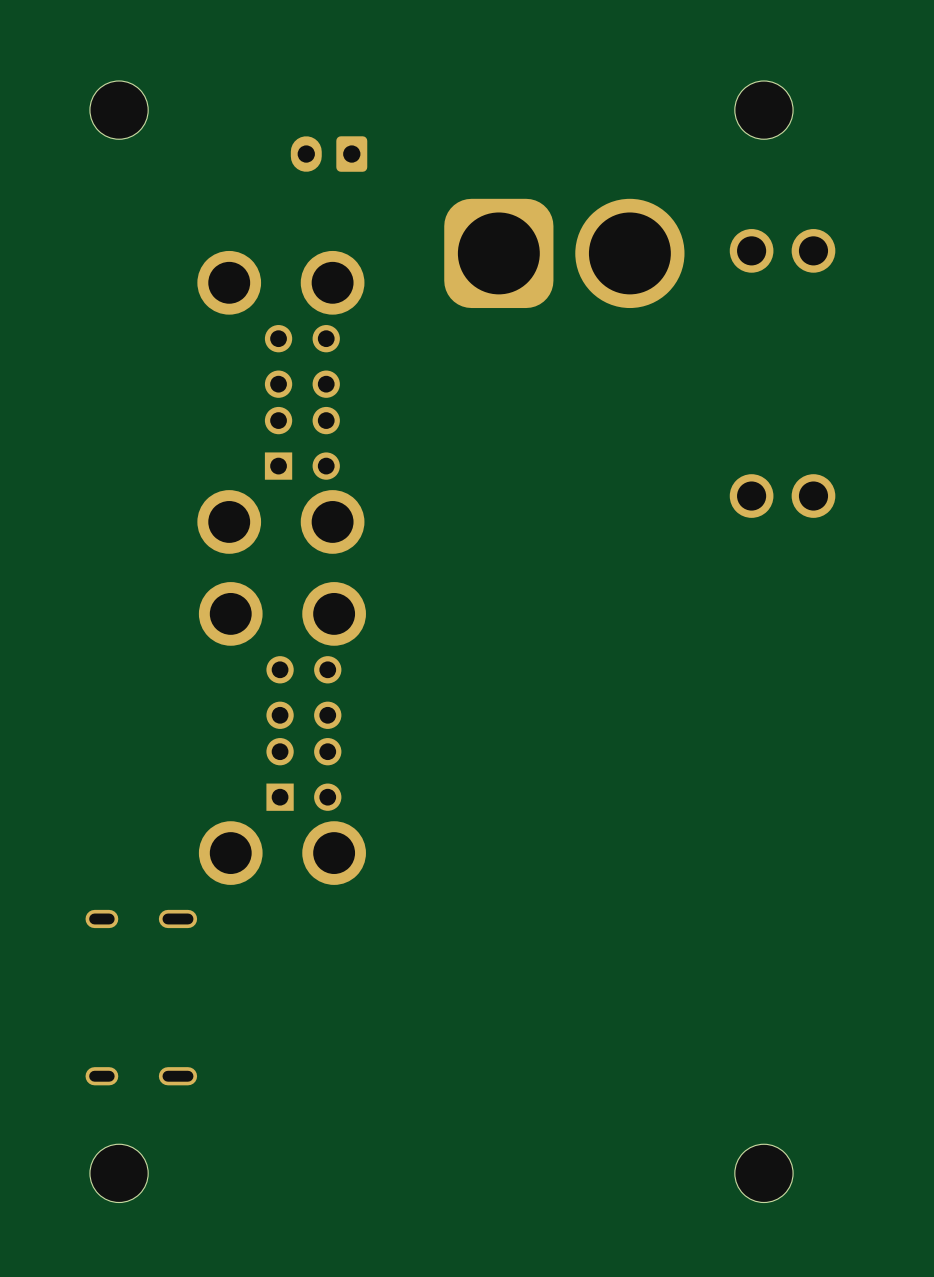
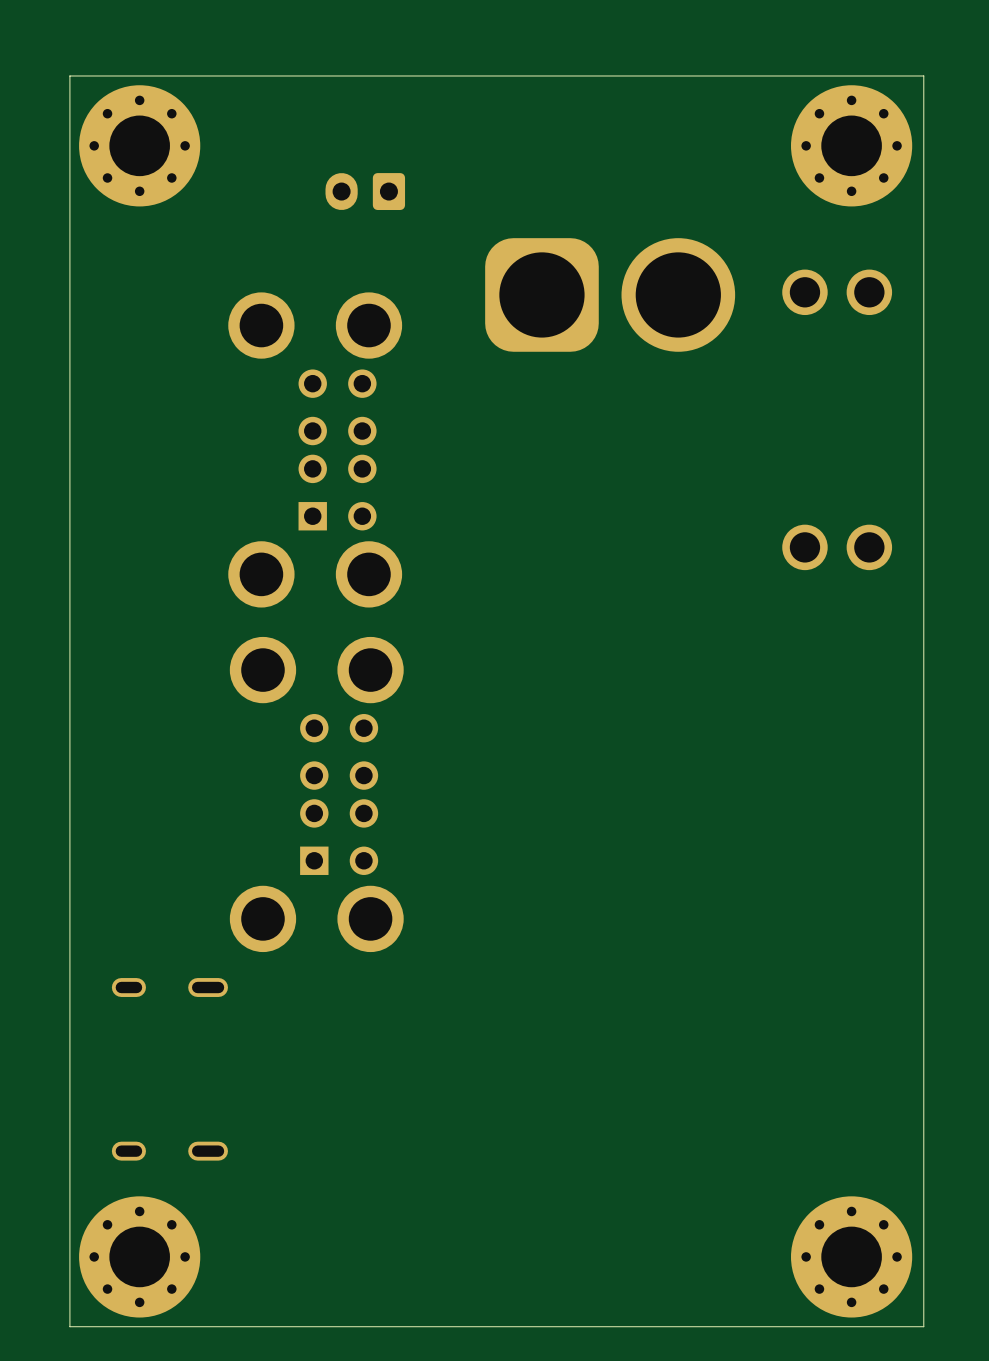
board edge: none -> (923, 75) (69, 75) (69, 1326) (923, 1326) (923, 75)
part footprint: [89, 80, 149, 140] -> [79, 85, 201, 207]
part: (763, 110) -> none
part: none -> (851, 145)
part footprint: [89, 1144, 149, 1203] -> [79, 1196, 201, 1318]
part: (763, 1173) -> none
part: none -> (851, 1256)

